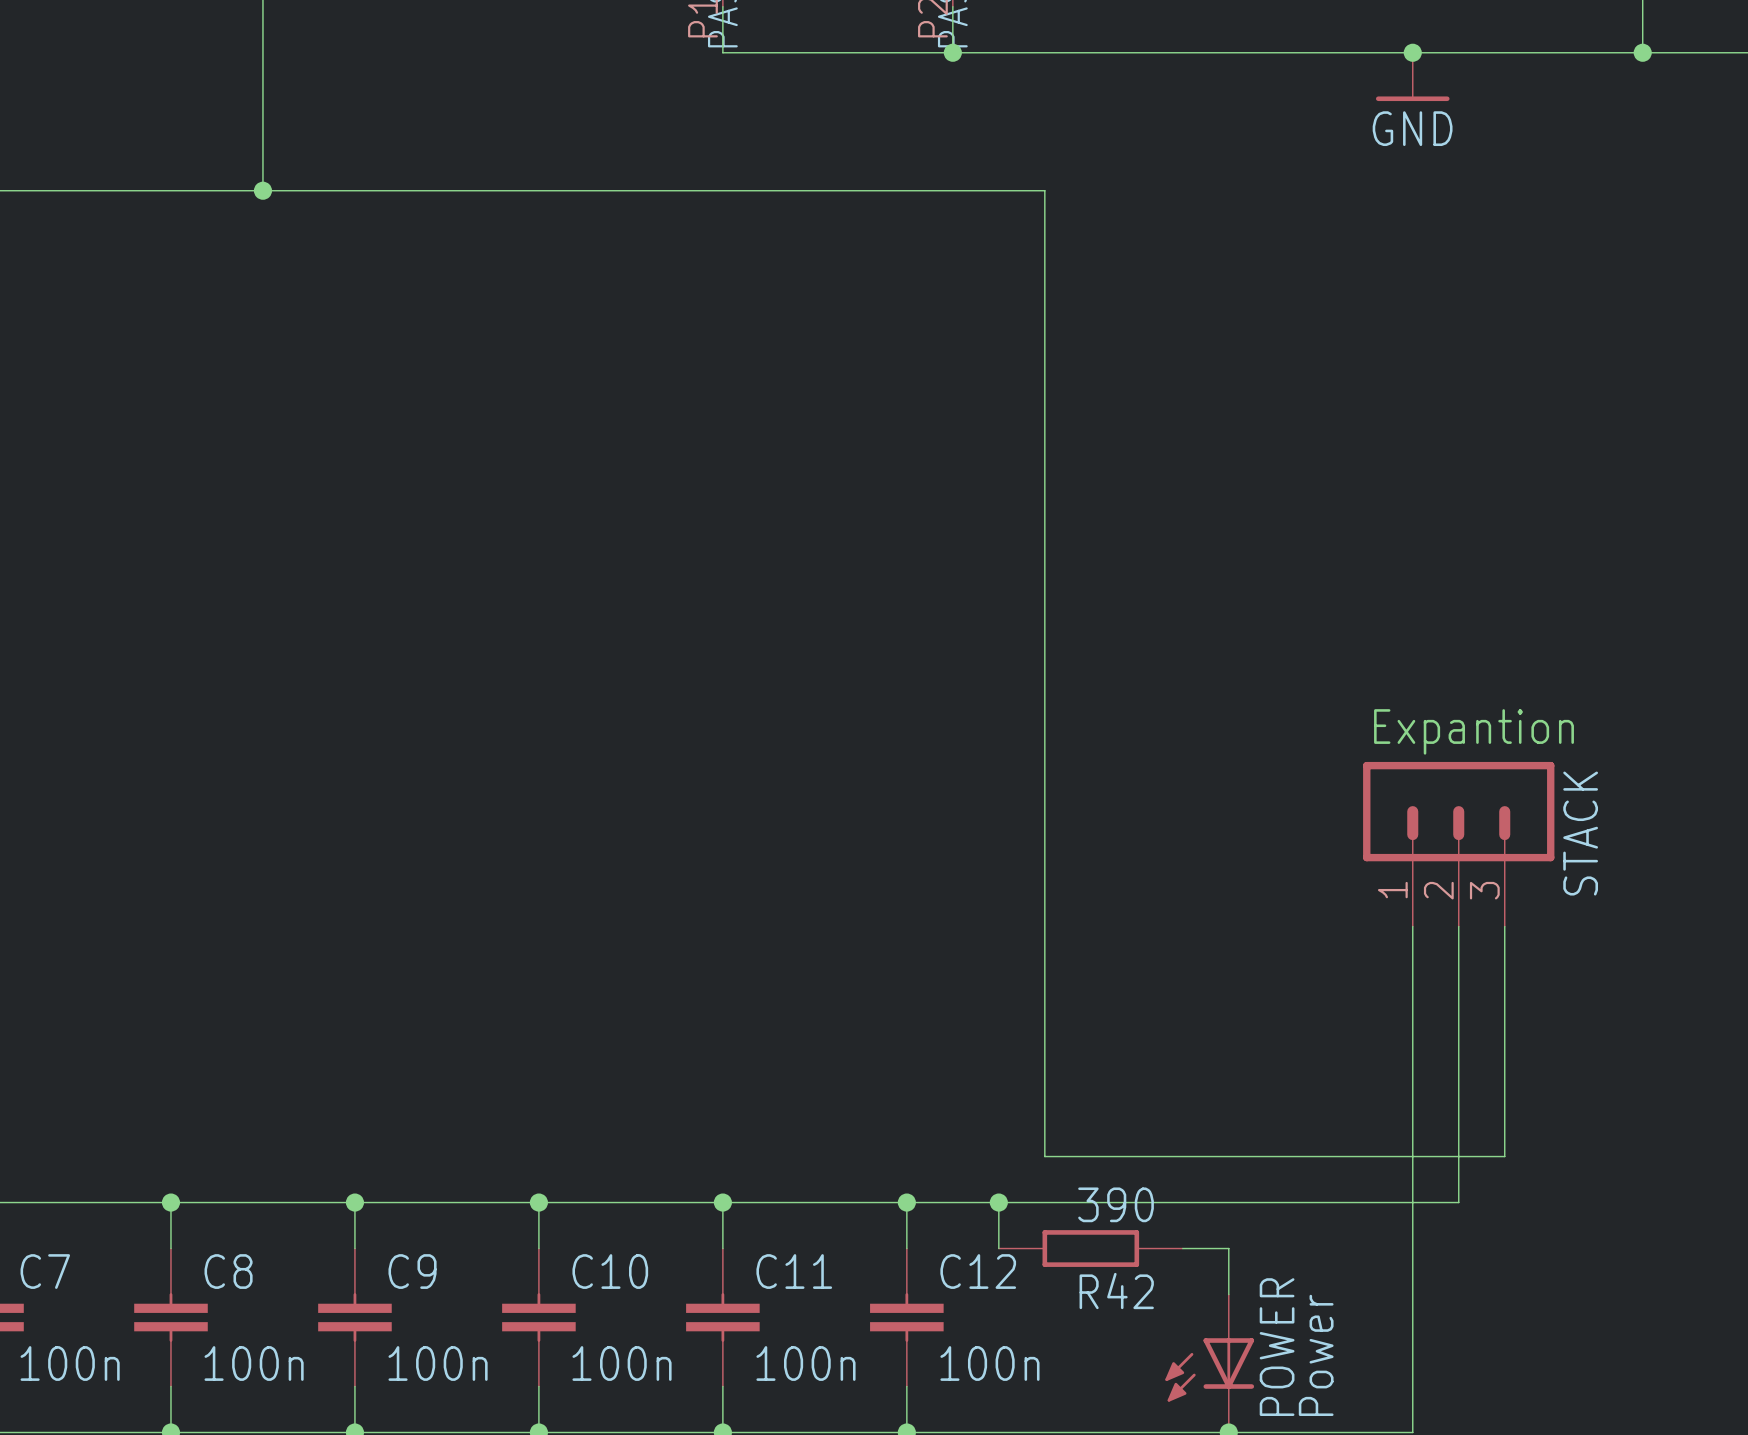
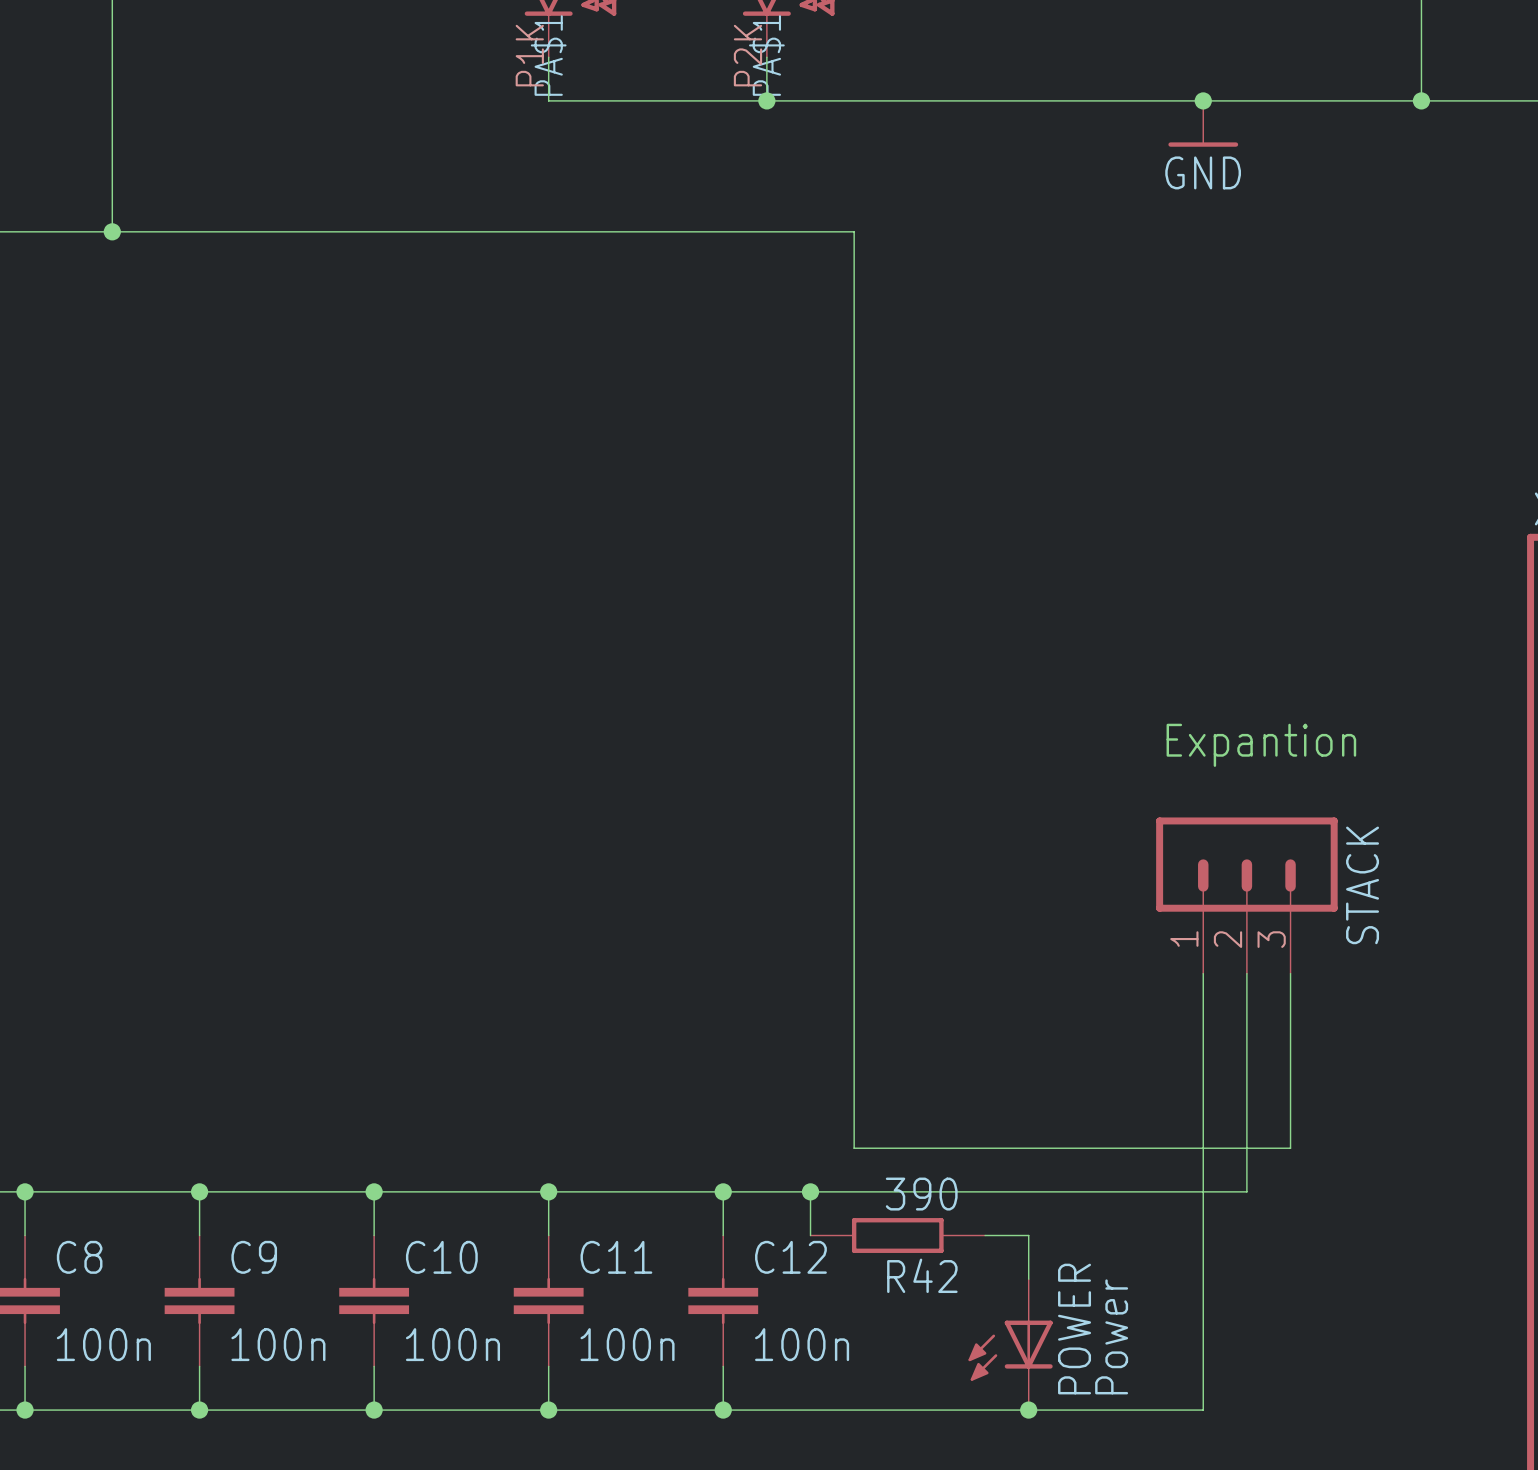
STACK position: (1458, 844) -> (1246, 895)

